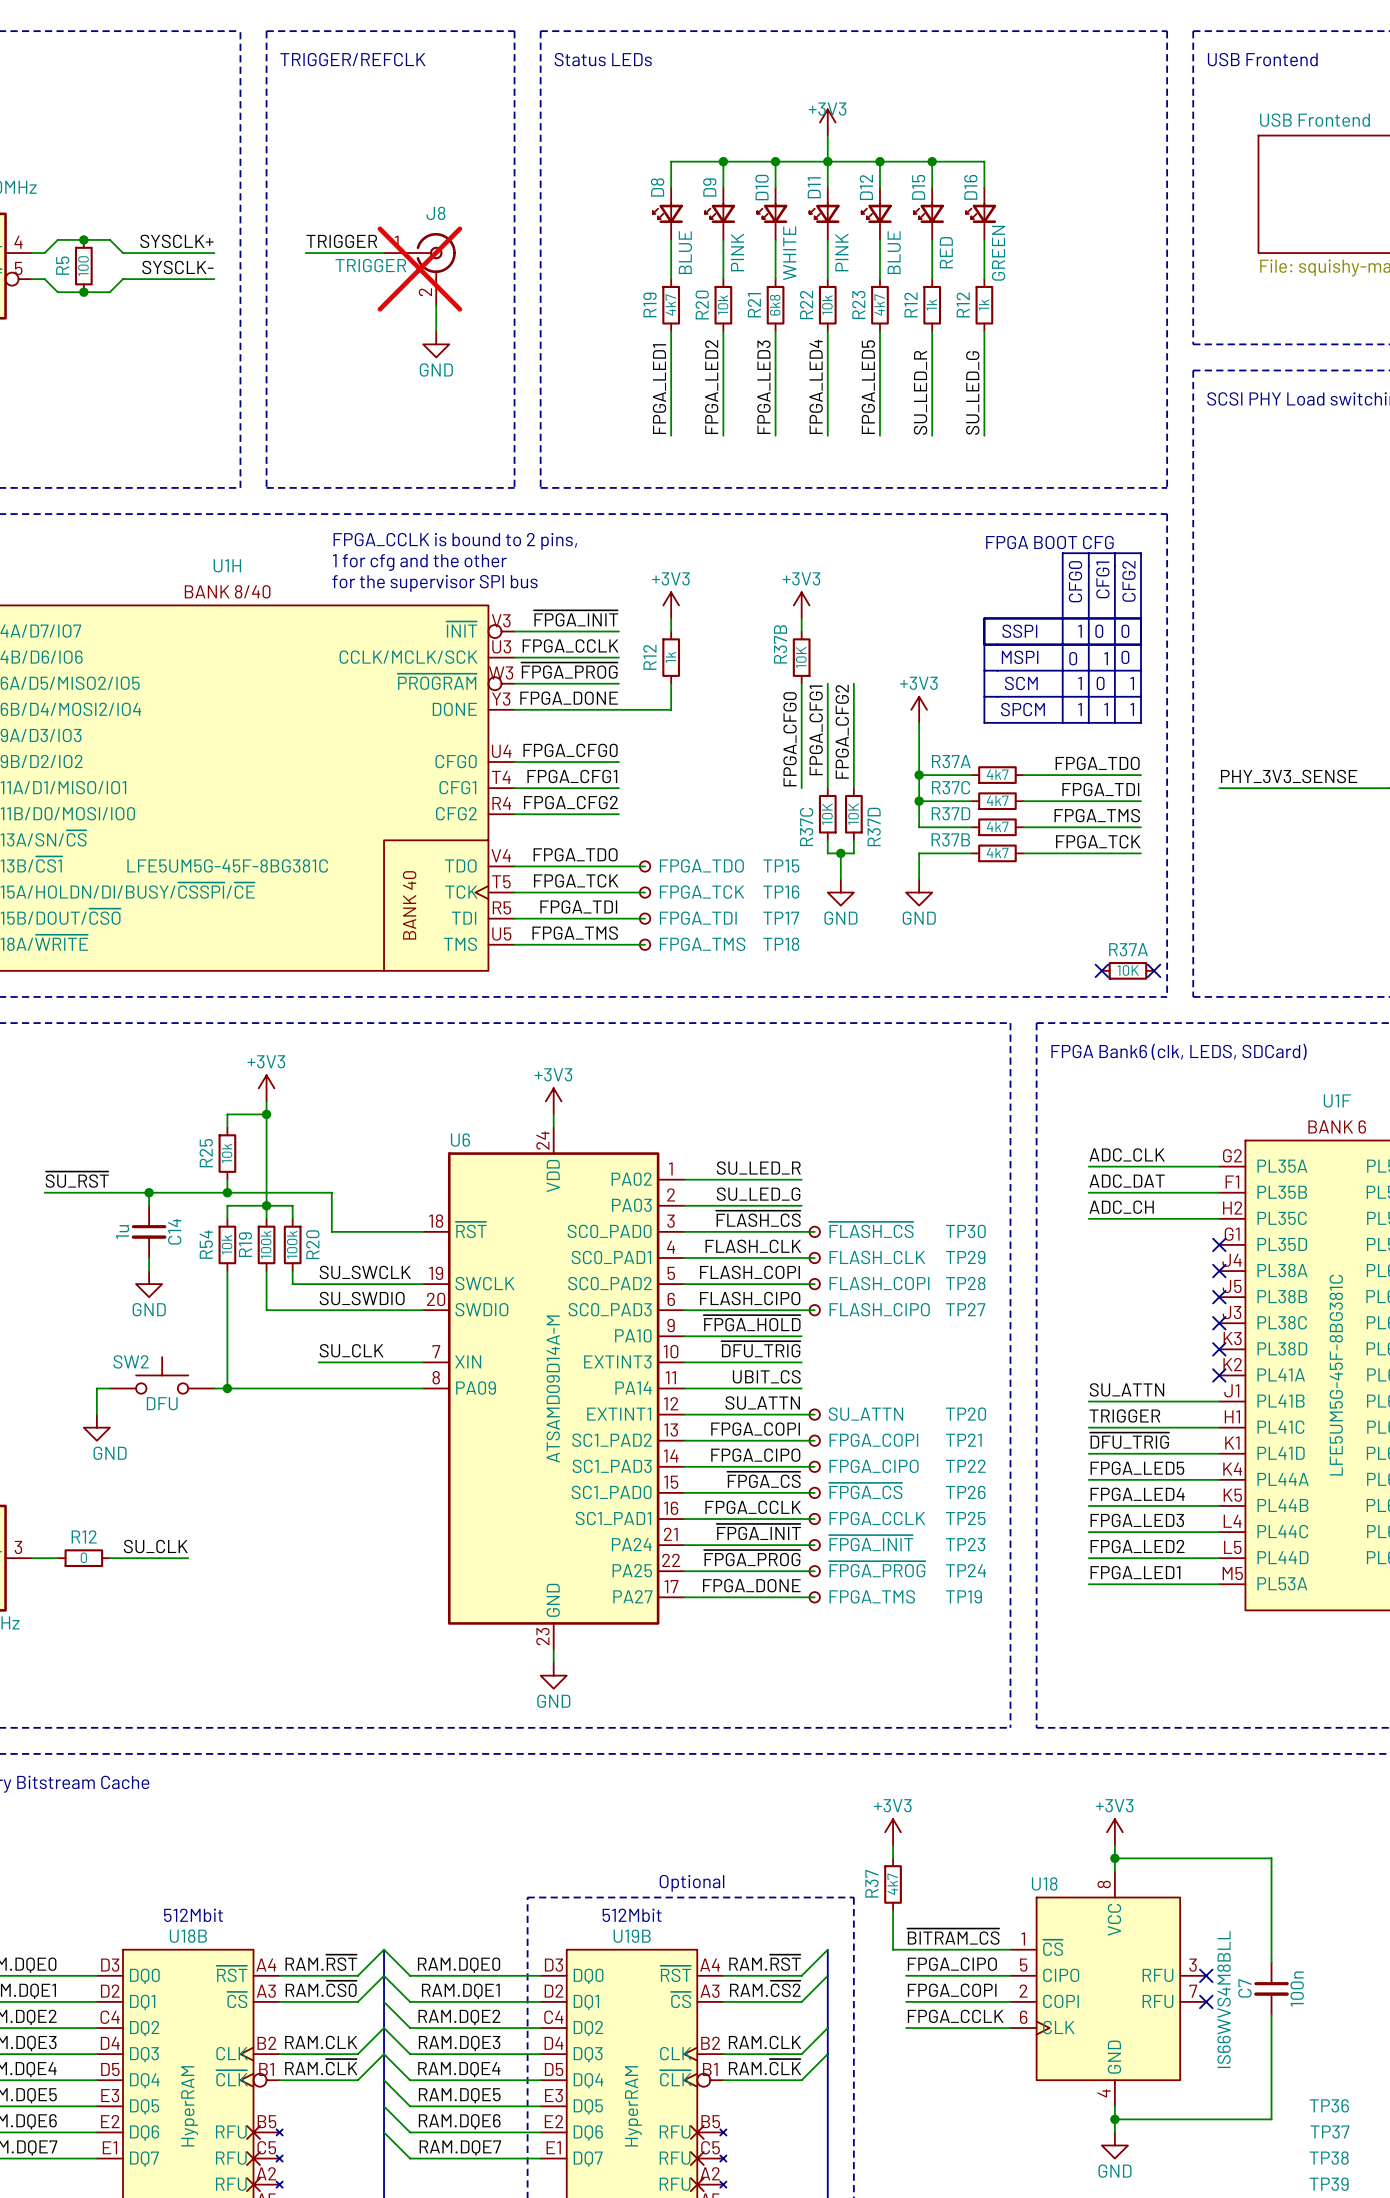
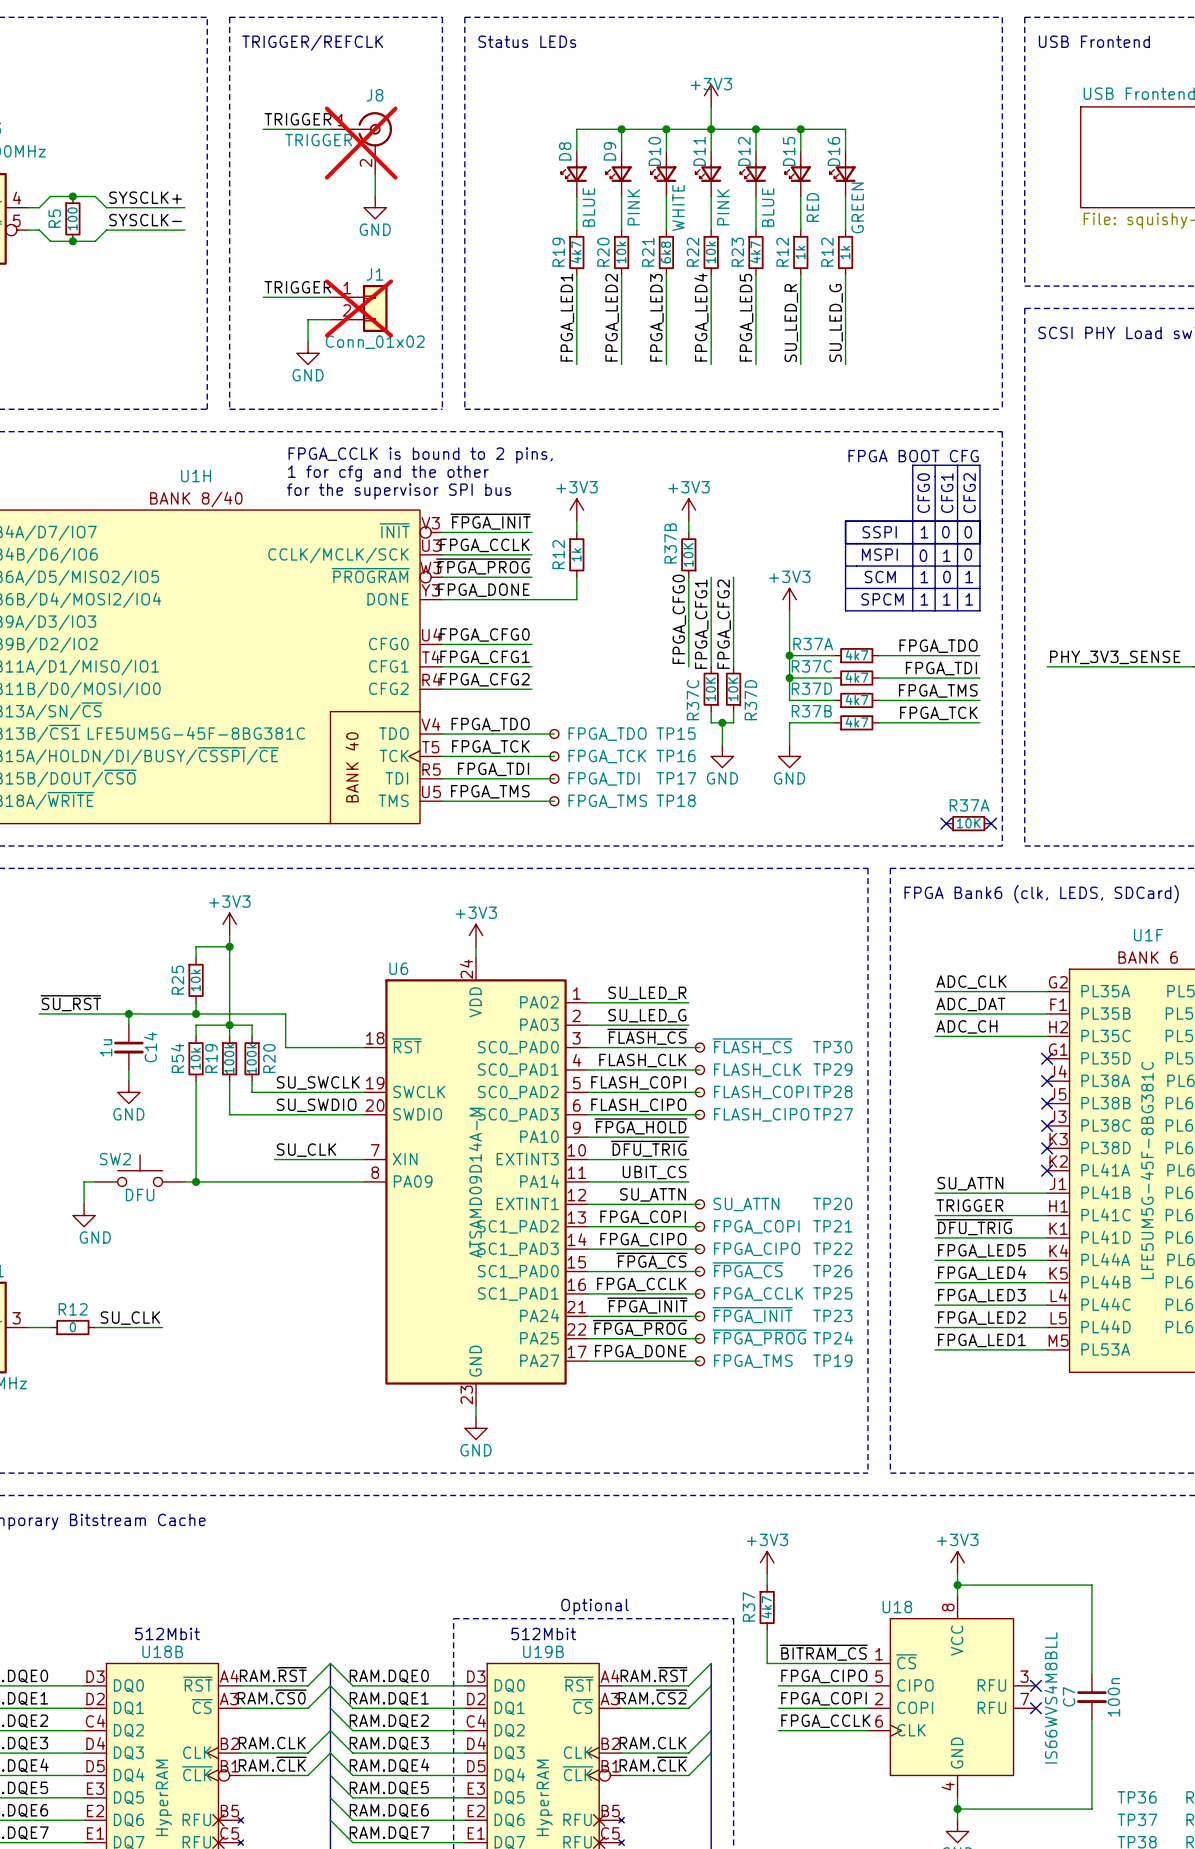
label: none -> TRIGGER (297, 119)
label: TRIGGER (341, 241) -> none
wire: (305, 253) (384, 253) -> (263, 129) (330, 129)
power symbol: none -> GND (375, 207)
J8 position: (419, 269) -> (361, 143)
wire: (436, 305) (436, 331) -> (375, 174) (375, 196)
power symbol: GND (436, 344) -> none
label: none -> TRIGGER (297, 287)
wire: none -> (263, 297) (330, 297)
J1: none -> Conn_01x02 (358, 308)
wire: none -> (330, 319) (308, 319) (308, 342)
power symbol: none -> GND (308, 353)

